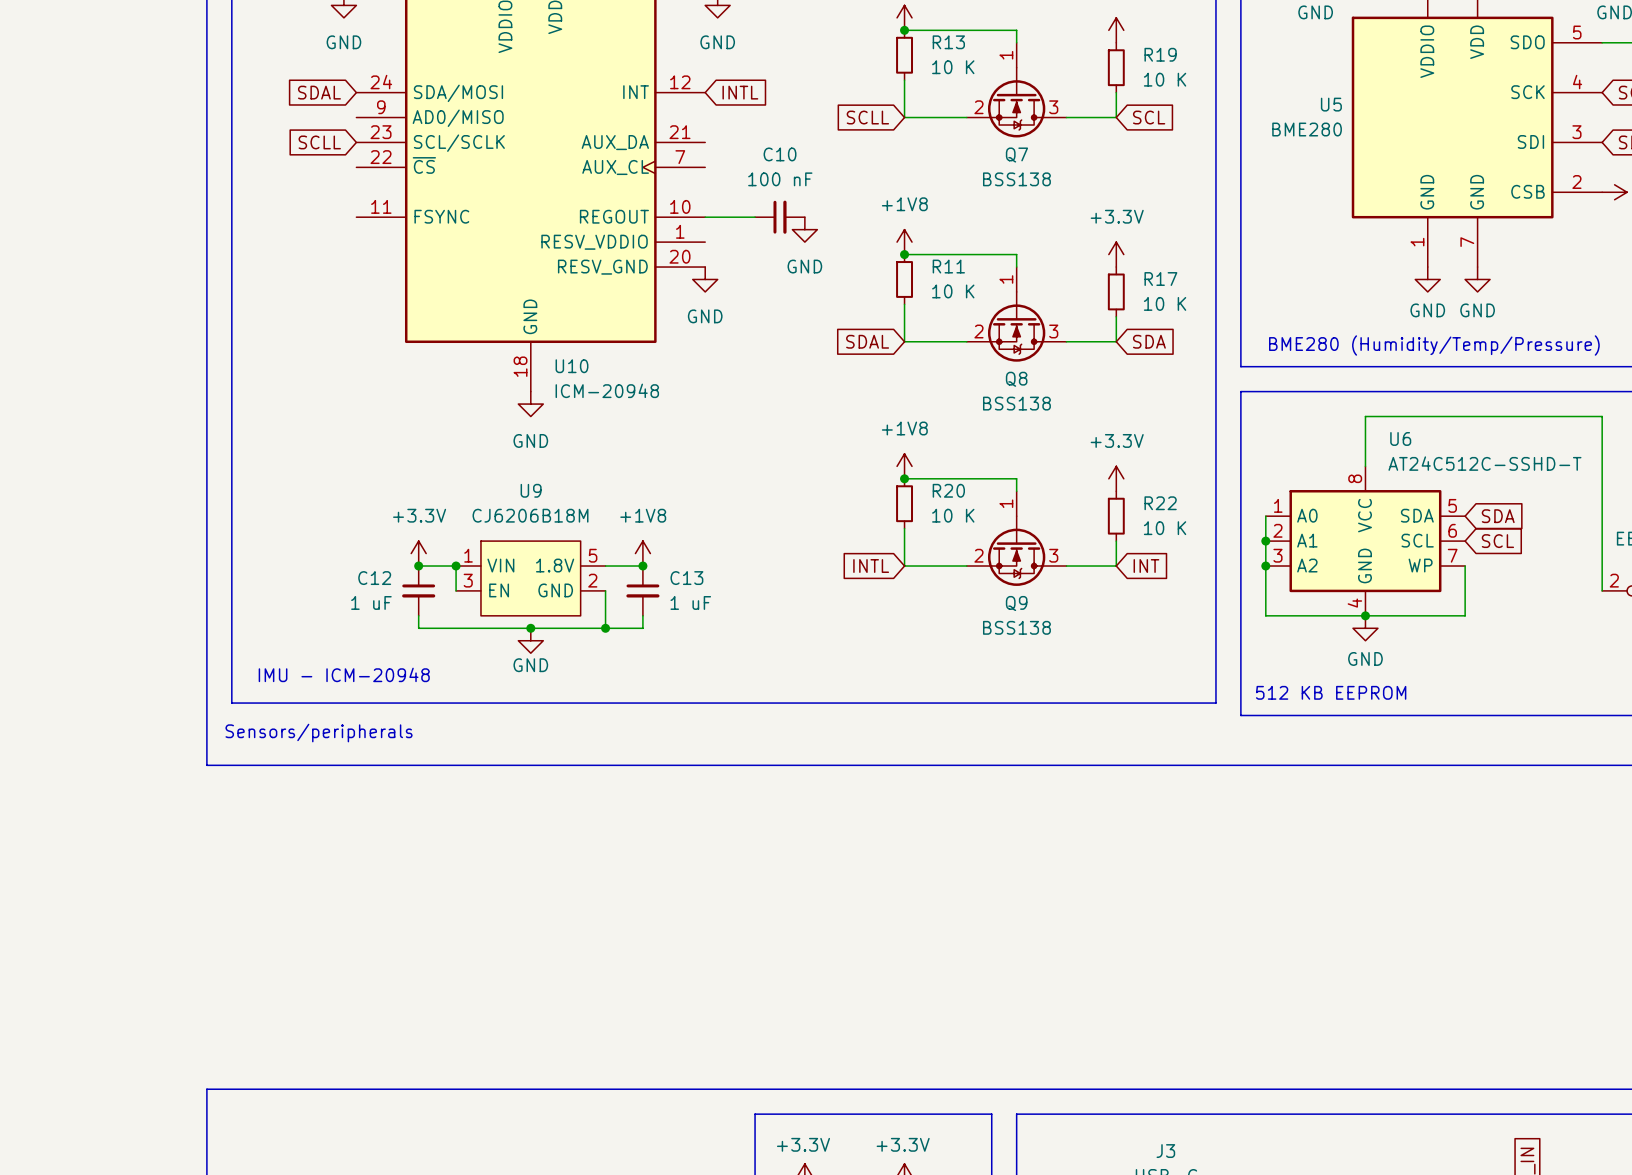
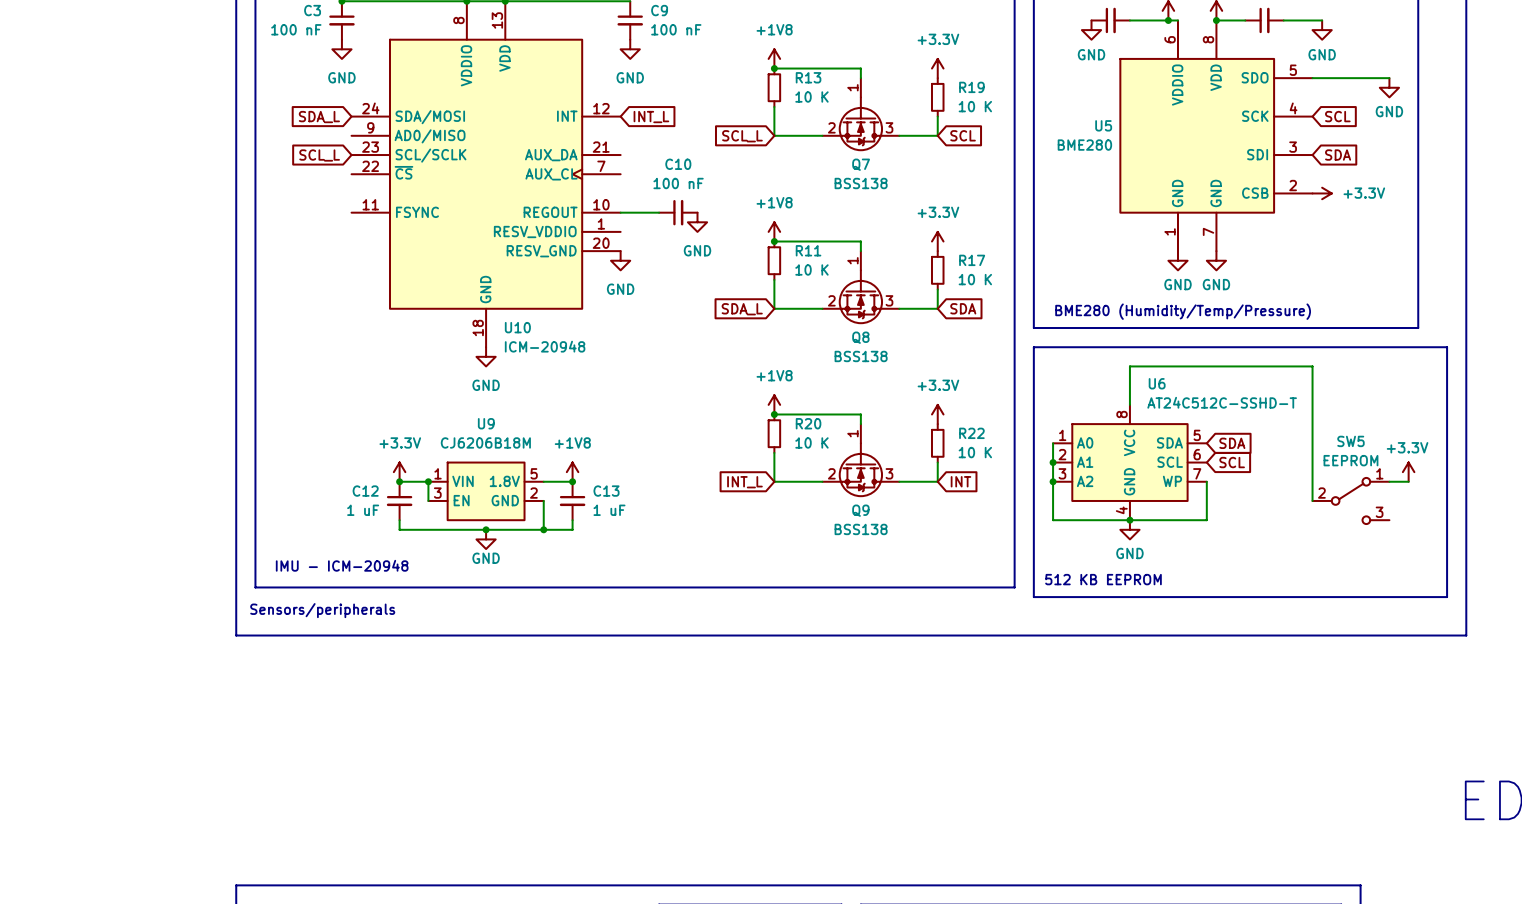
global label: SDAL (319, 92) -> SDA_L (319, 117)
global label: INTL (740, 92) -> INT_L (651, 117)
global label: SCLL (867, 117) -> SCL_L (742, 136)
global label: SCLL (319, 142) -> SCL_L (319, 155)
global label: SDAL (867, 341) -> SDA_L (742, 309)
global label: INTL (871, 566) -> INT_L (744, 482)

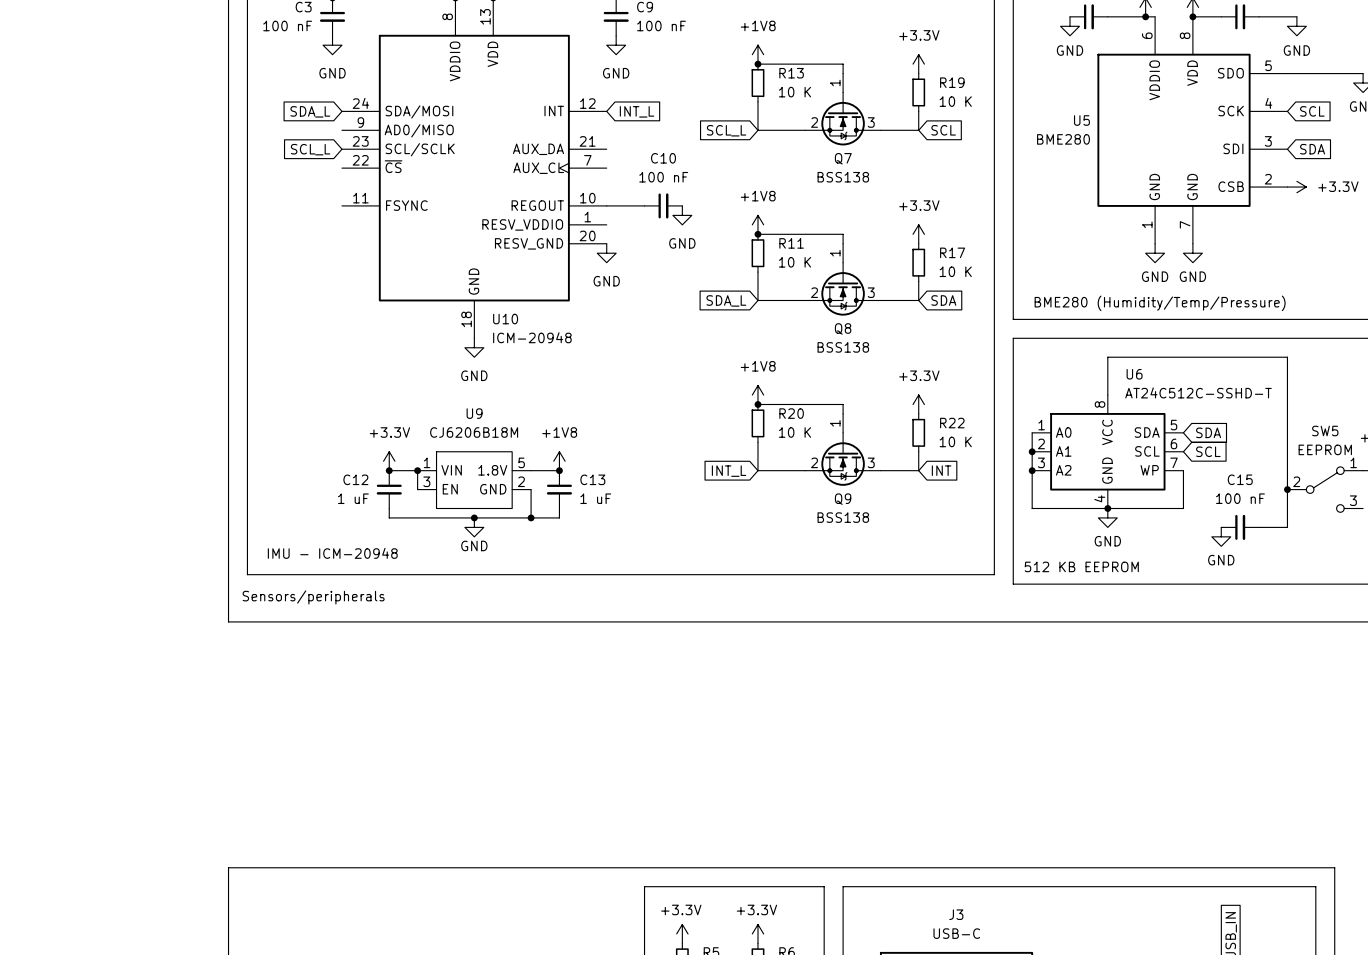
wire: none -> (1287, 489) (1287, 527) (1259, 527)
junction: none -> (1287, 489)
C15: none -> 100 nF (1240, 527)
power symbol: none -> GND (1221, 536)

